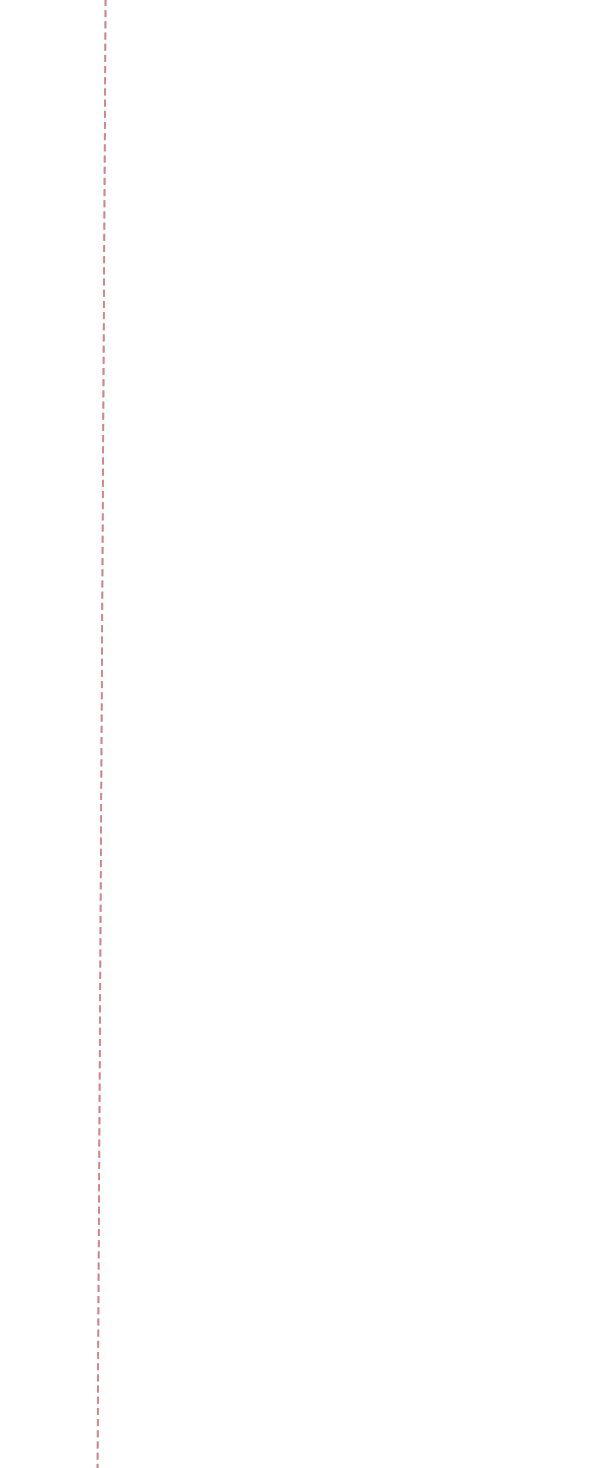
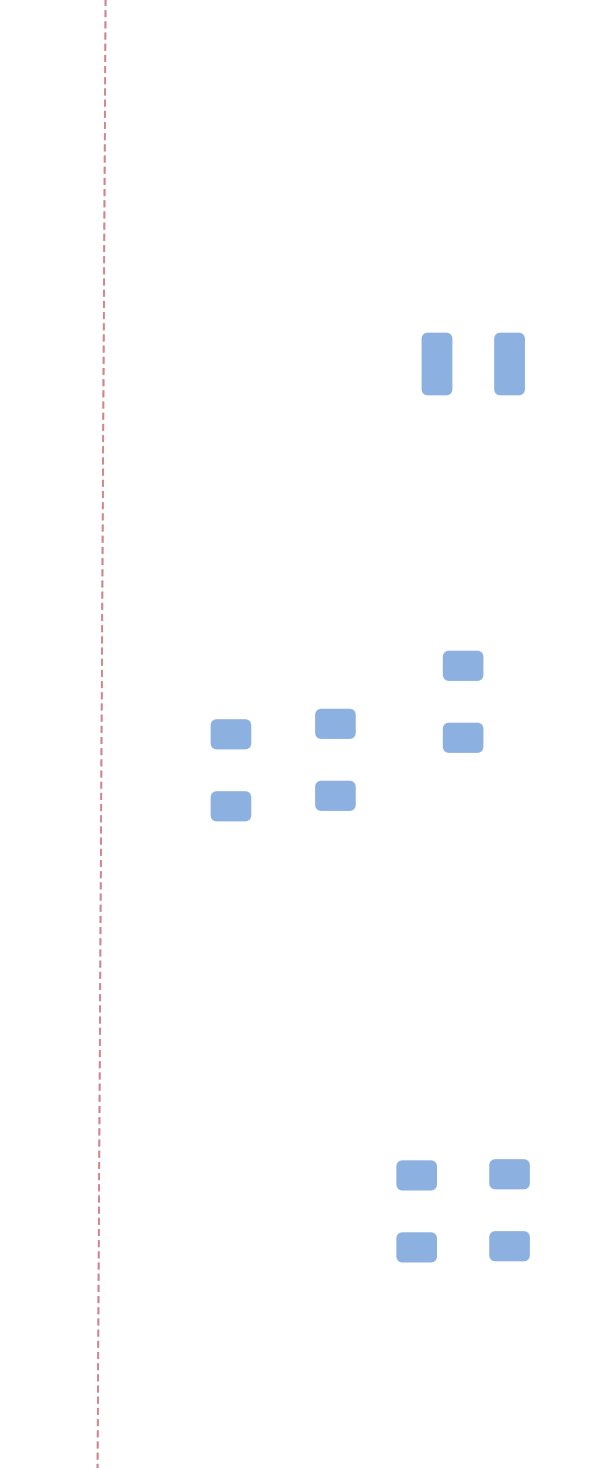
part: none -> (473, 363)
part: none -> (463, 701)
part: none -> (335, 759)
part: none -> (230, 770)
part: none -> (509, 1210)
part: none -> (416, 1211)

